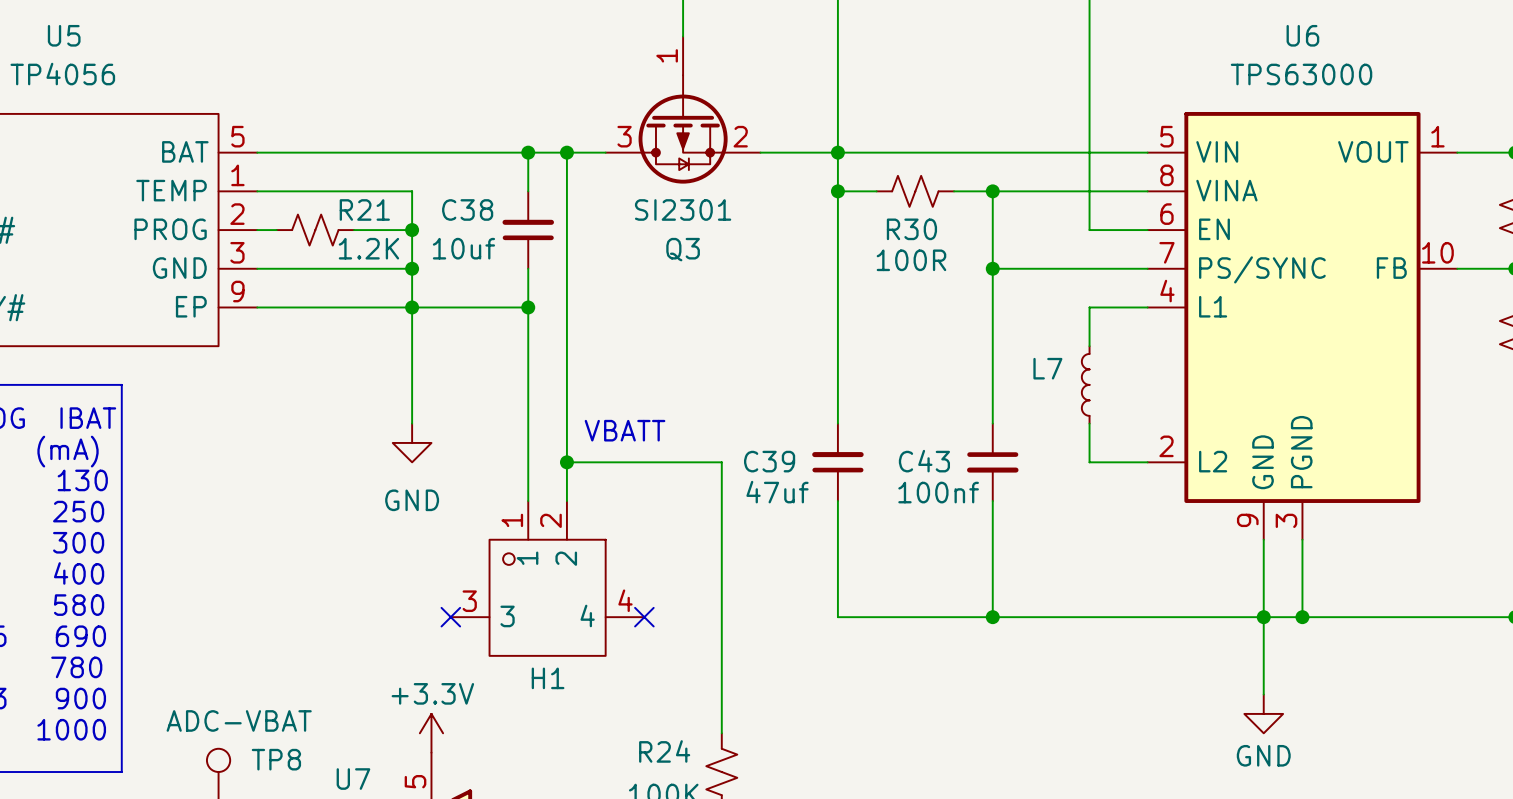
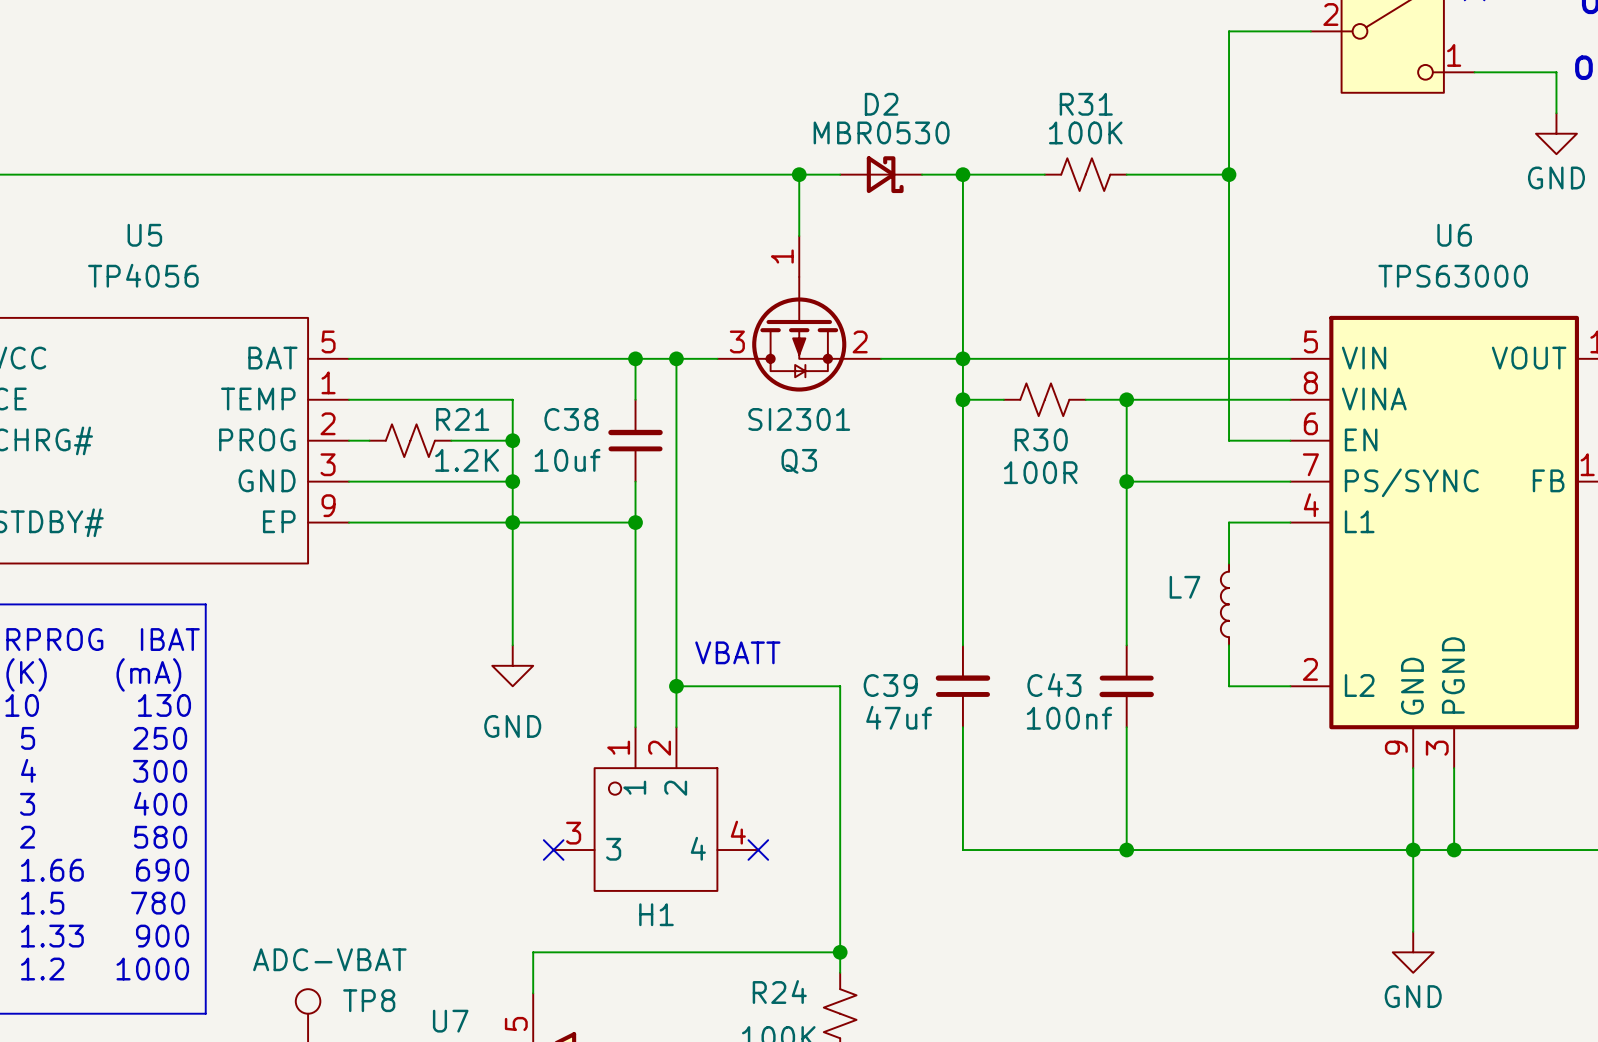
wire: none -> (840, 952) (533, 952) (533, 993)
junction: none -> (840, 952)
power symbol: +3.3V (431, 733) -> none

